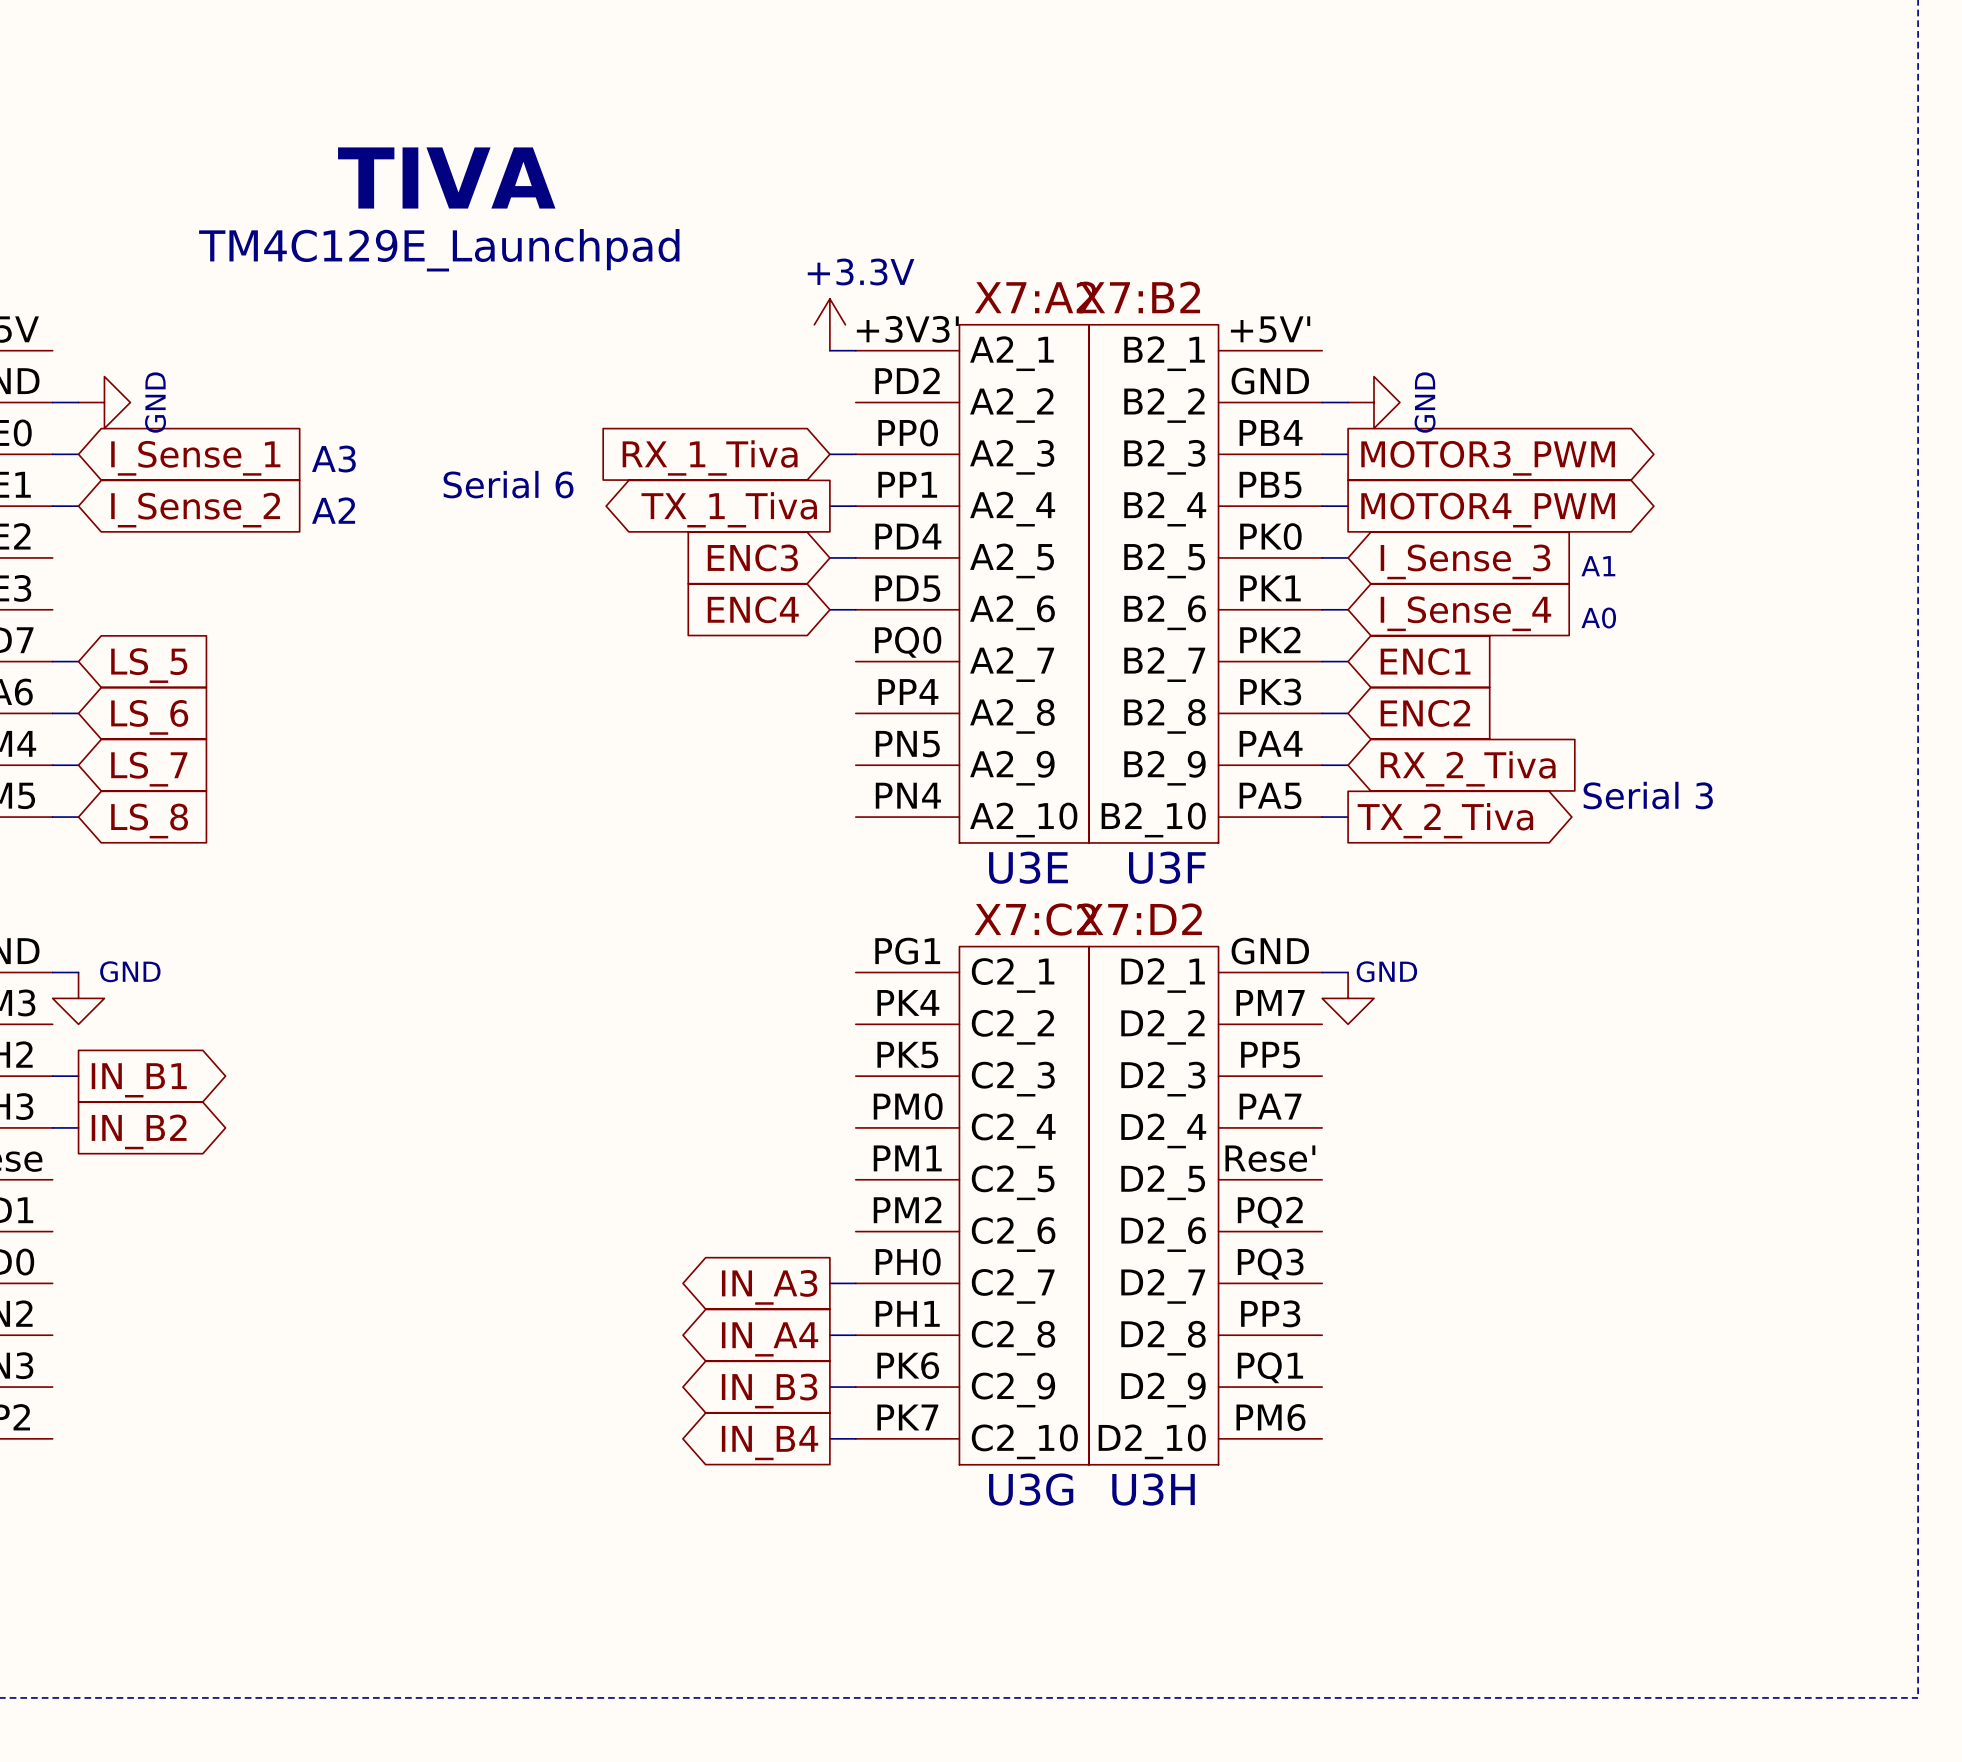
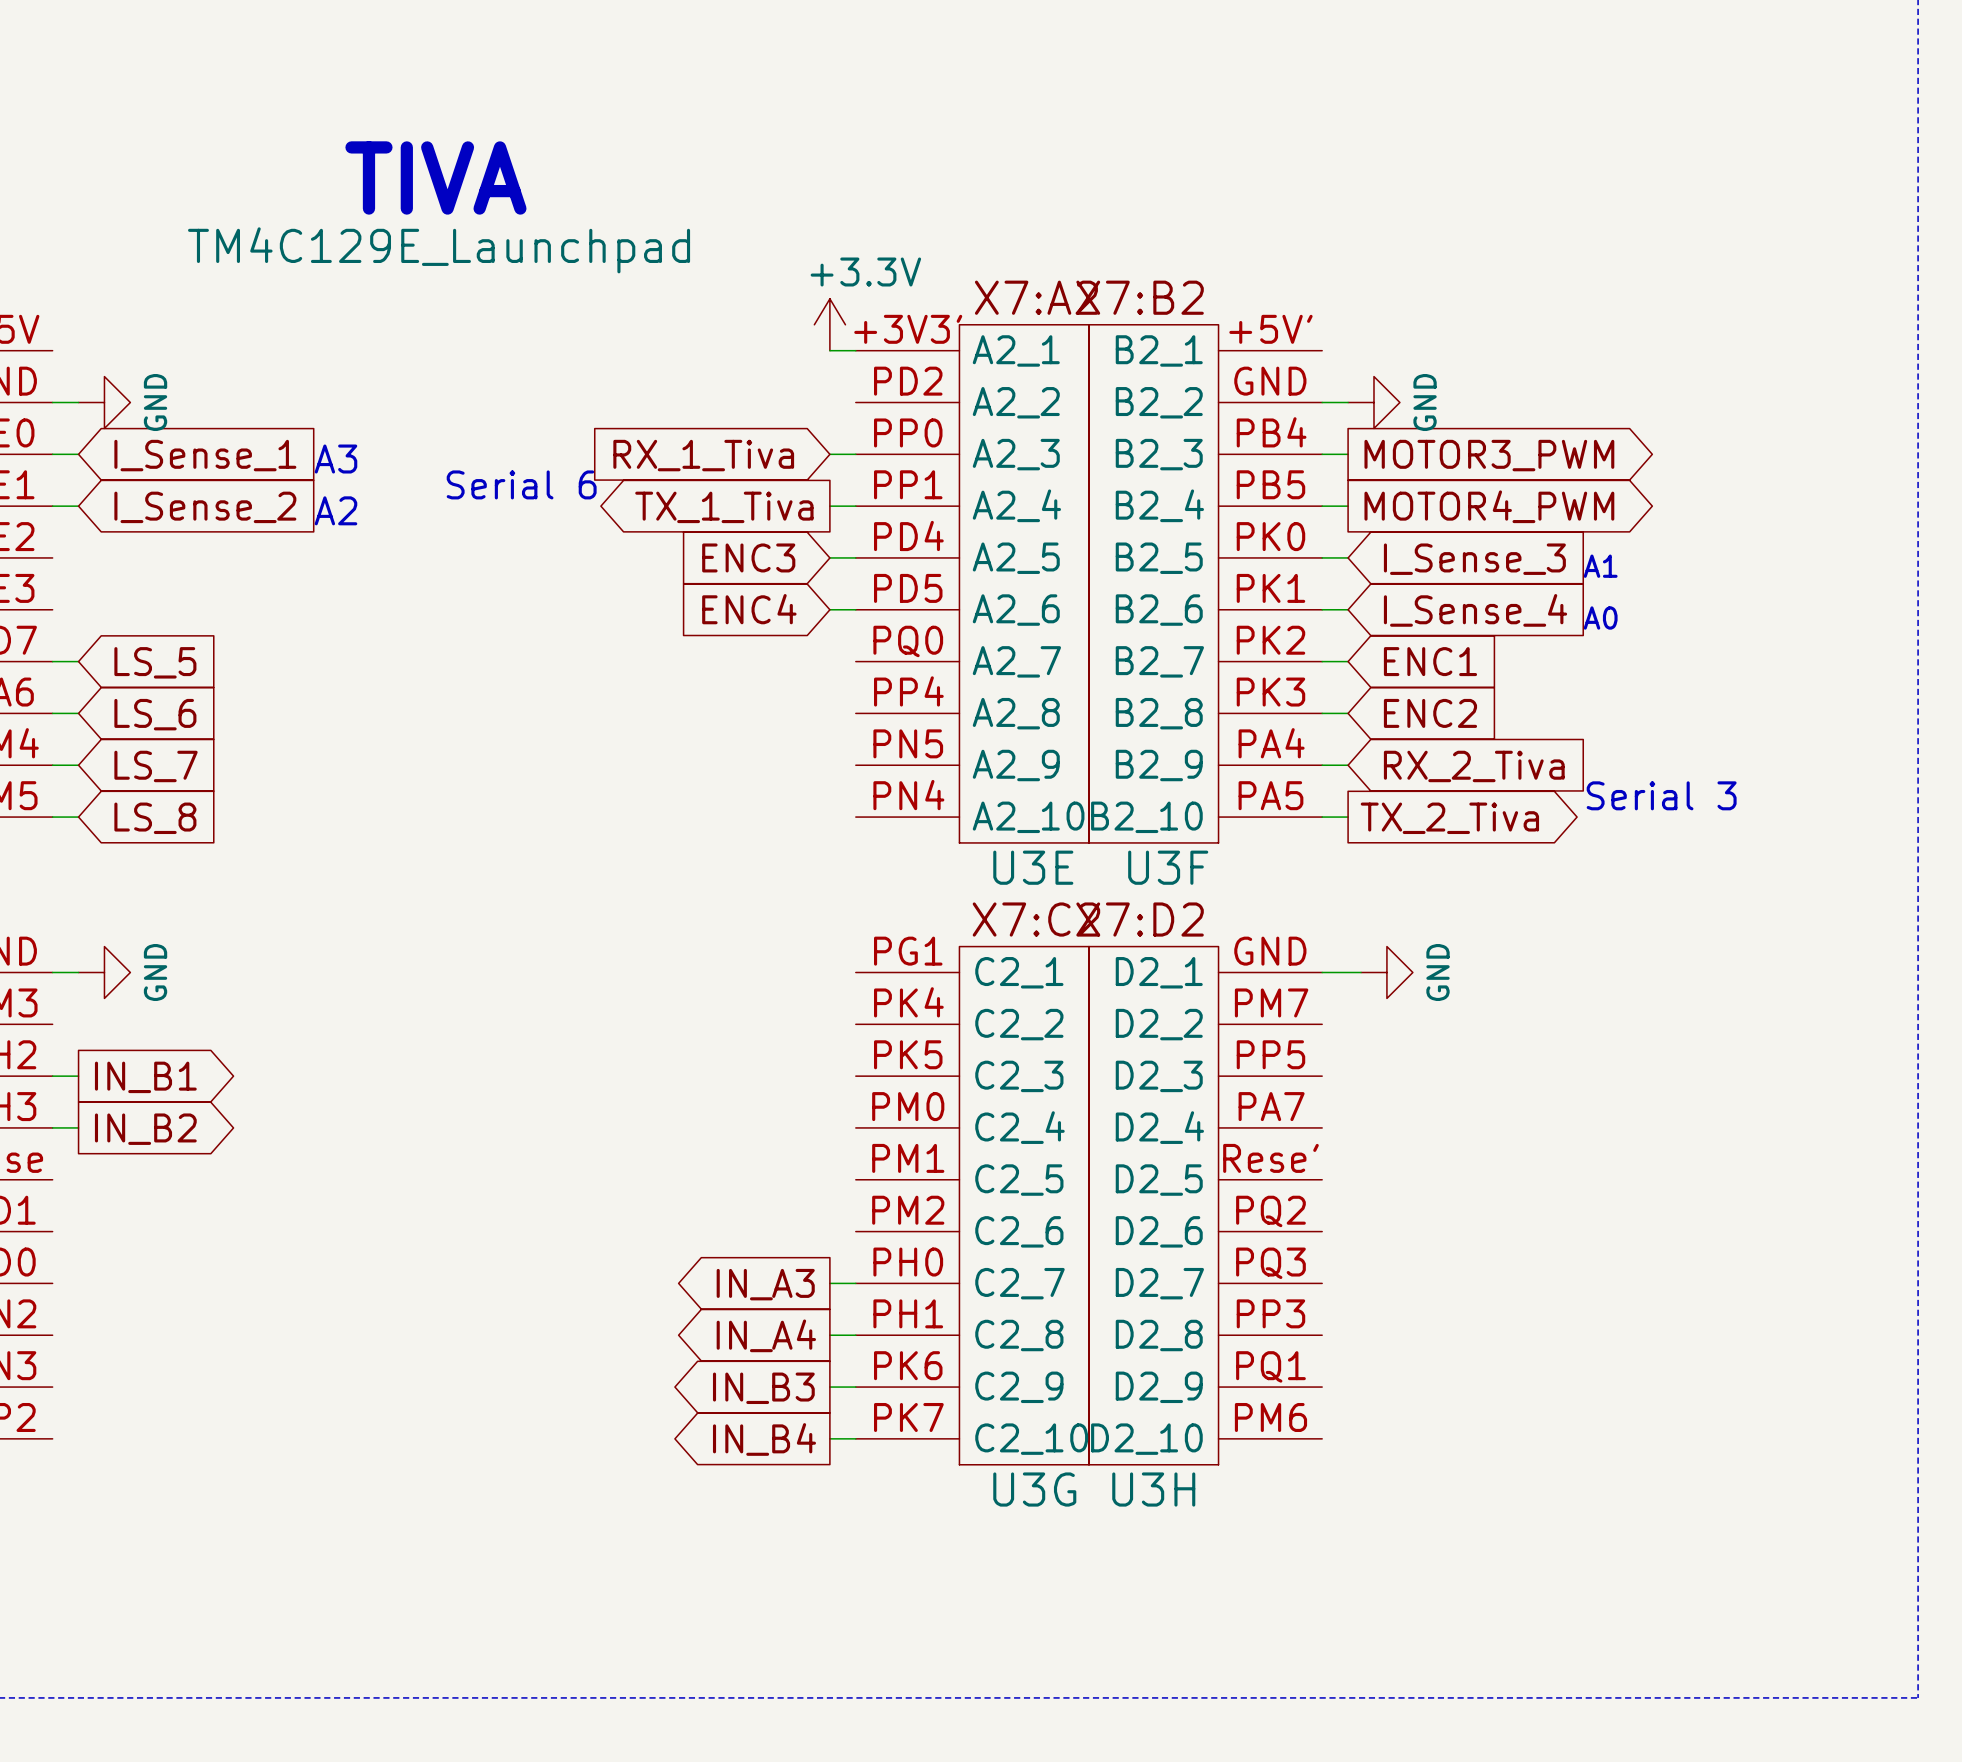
wire: none -> (1348, 972) (1361, 972)
power symbol rotation: 0° (78, 998) -> 90° counterclockwise (104, 972)
power symbol position: GND (78, 998) -> GND (104, 972)
power symbol rotation: 0° (1348, 998) -> 90° counterclockwise (1386, 972)
power symbol position: GND (1348, 998) -> GND (1386, 972)

